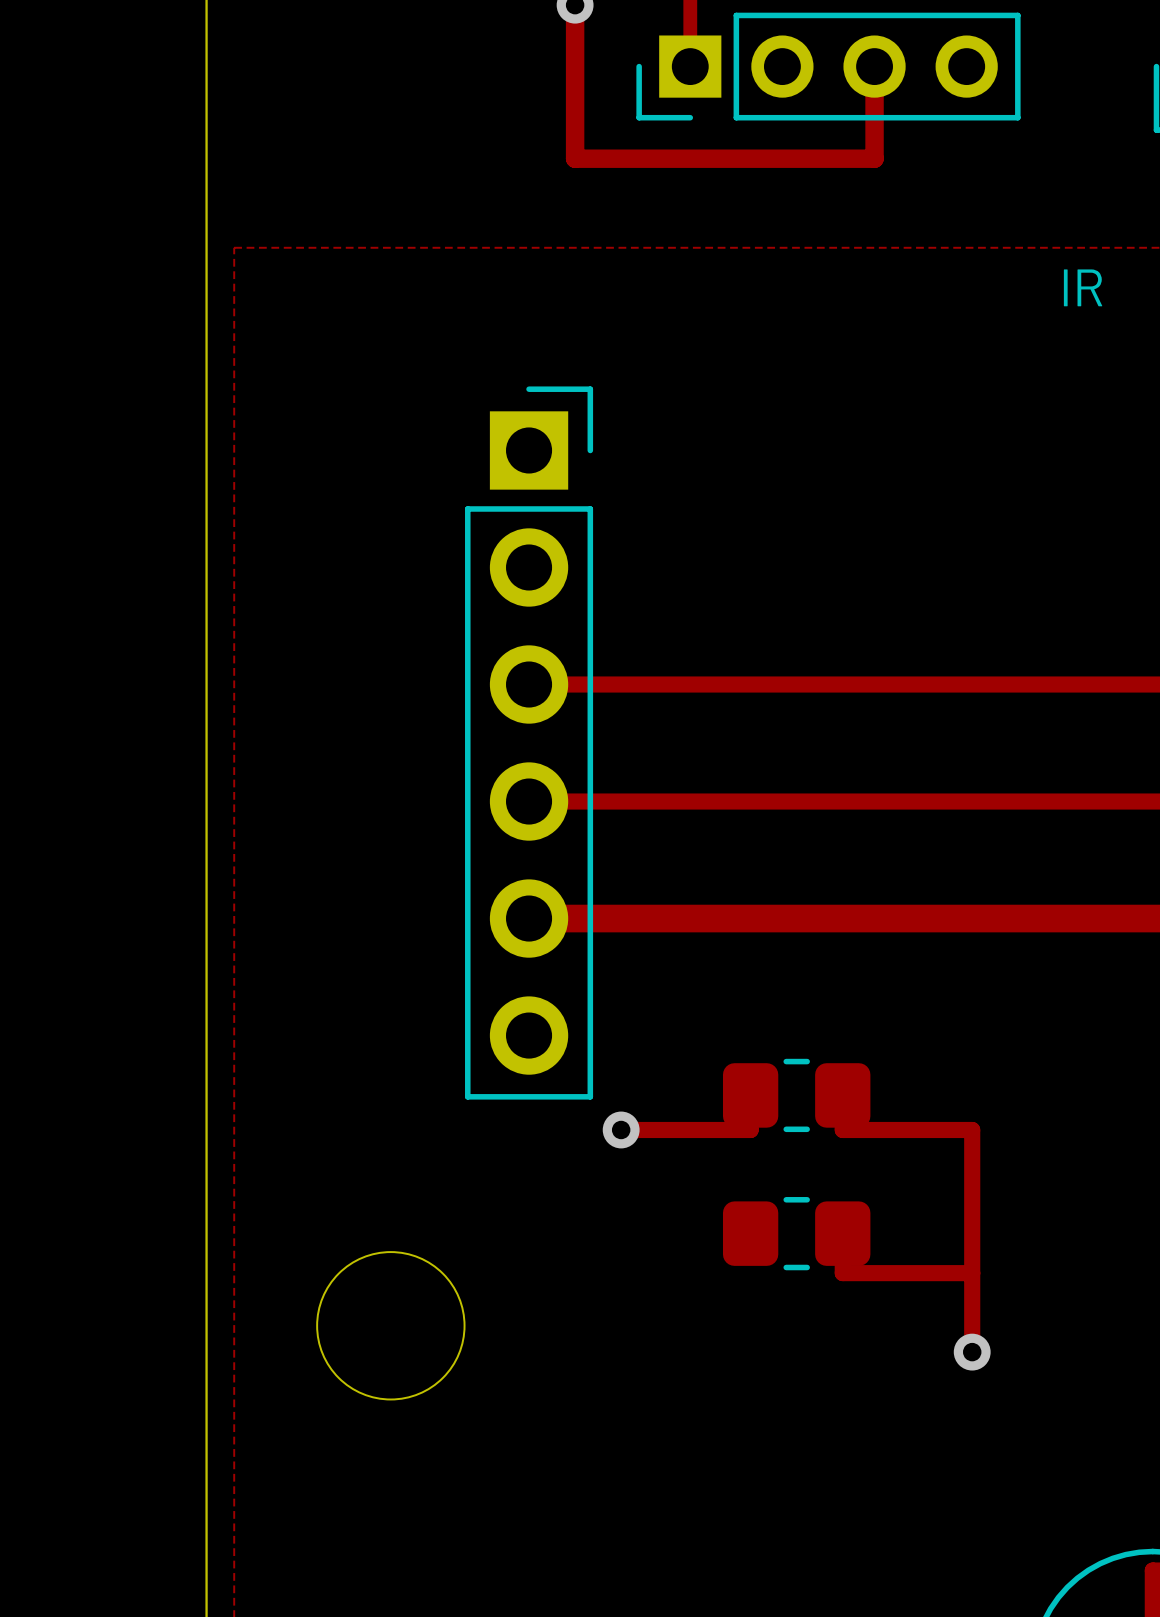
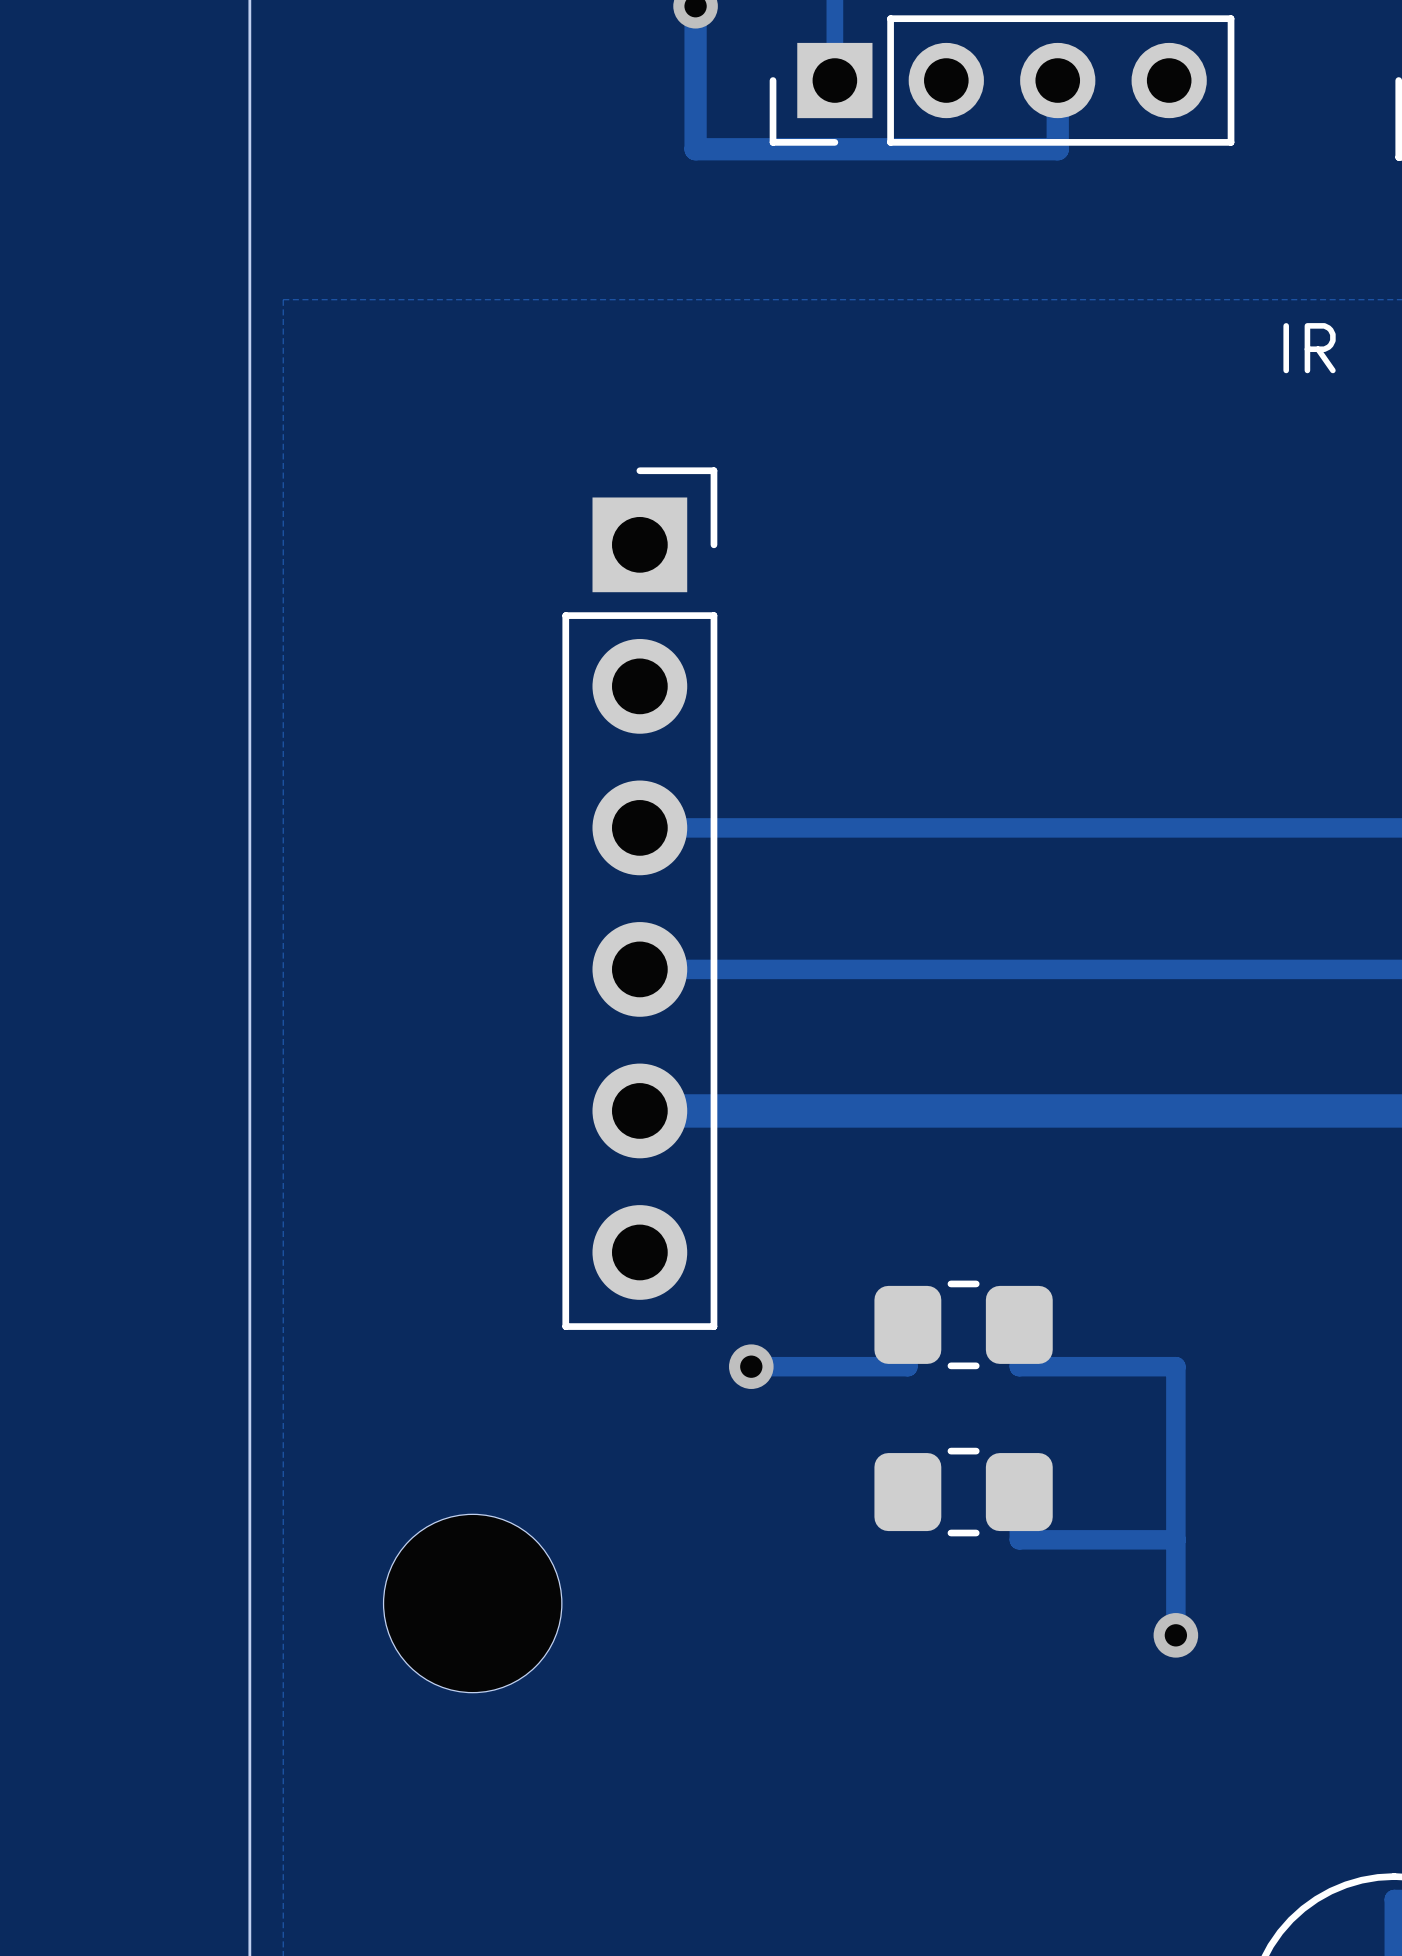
track: (575, 123) (575, 158) (874, 158) (874, 123) -> (695, 149) (1057, 149)

